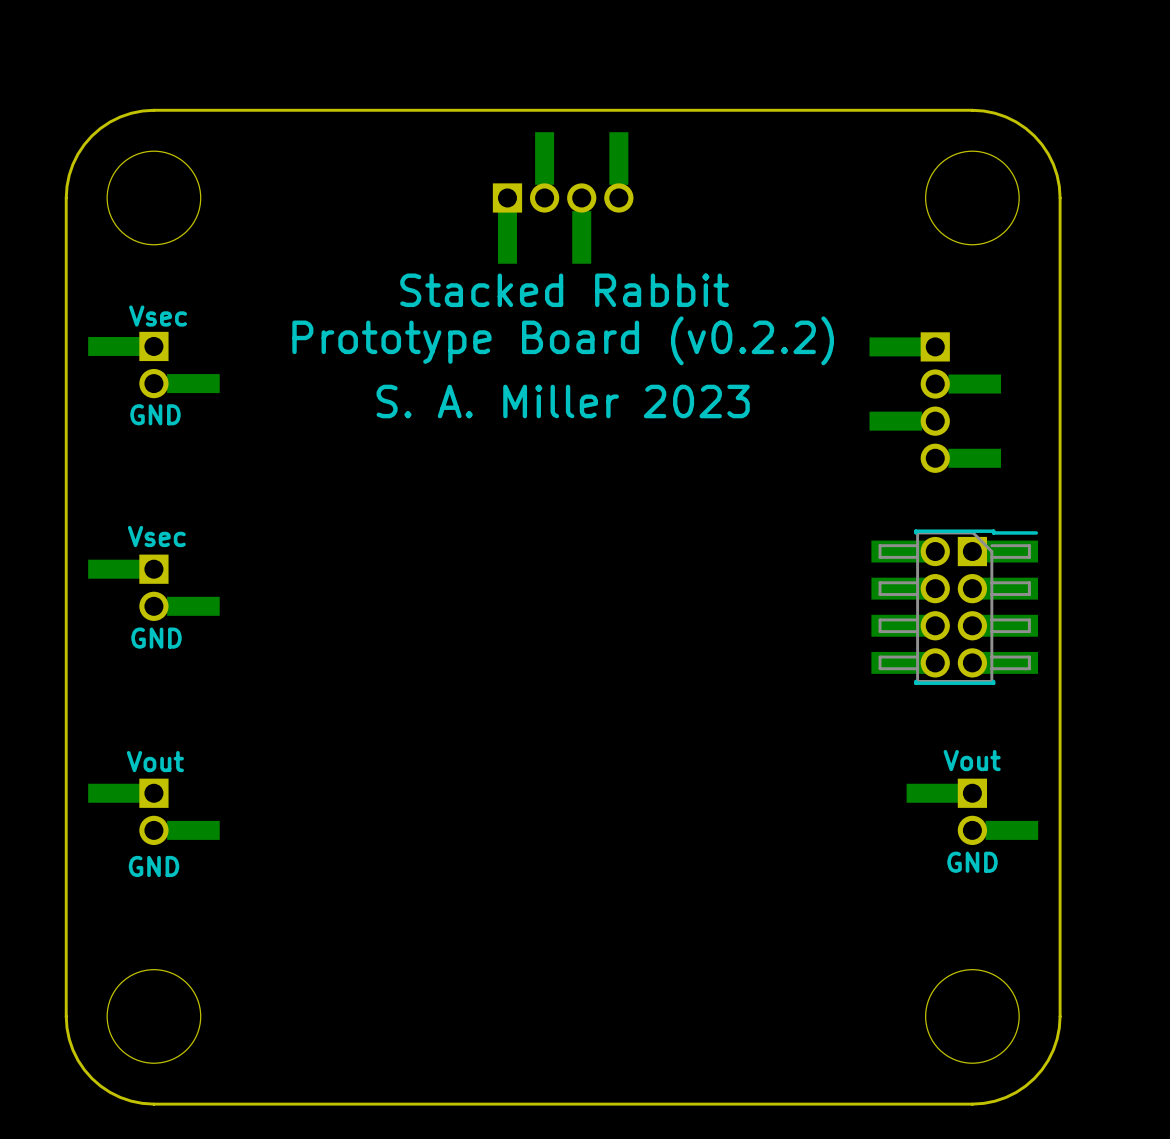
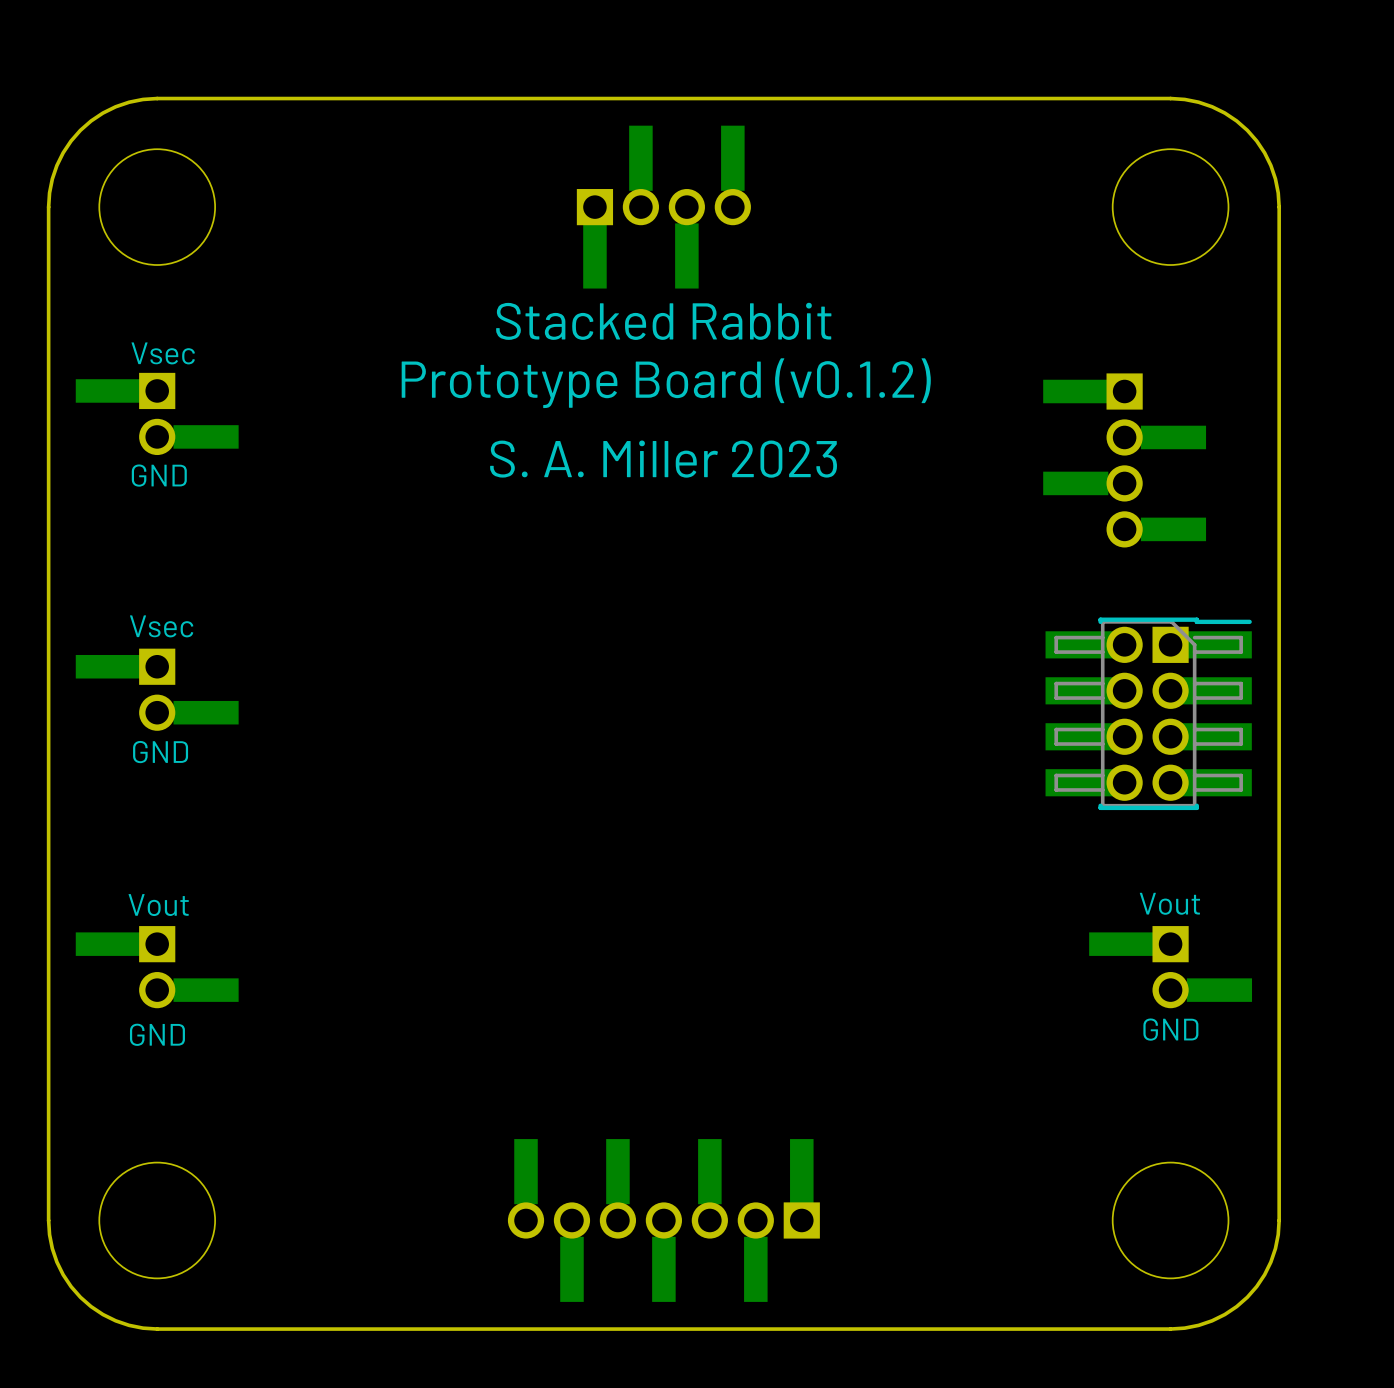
text: Prototype Board (v0.2.2) (563, 340) -> Prototype Board (v0.1.2) (666, 383)
part: none -> (663, 1220)

